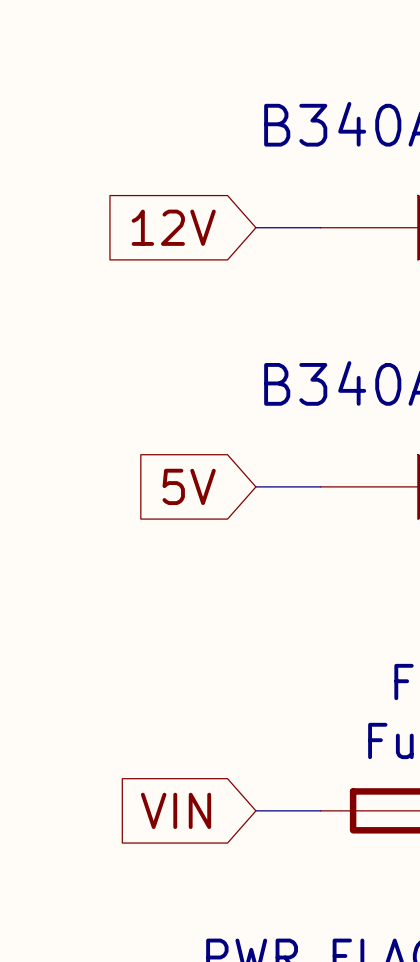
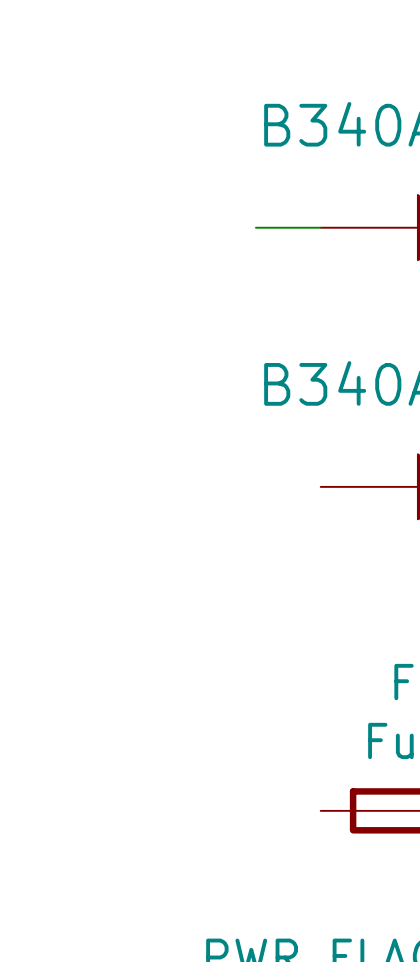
global label: 12V (173, 227) -> none
global label: 5V (189, 486) -> none
wire: (255, 486) (320, 486) -> none
global label: VIN (176, 810) -> none
wire: (255, 810) (320, 810) -> none

